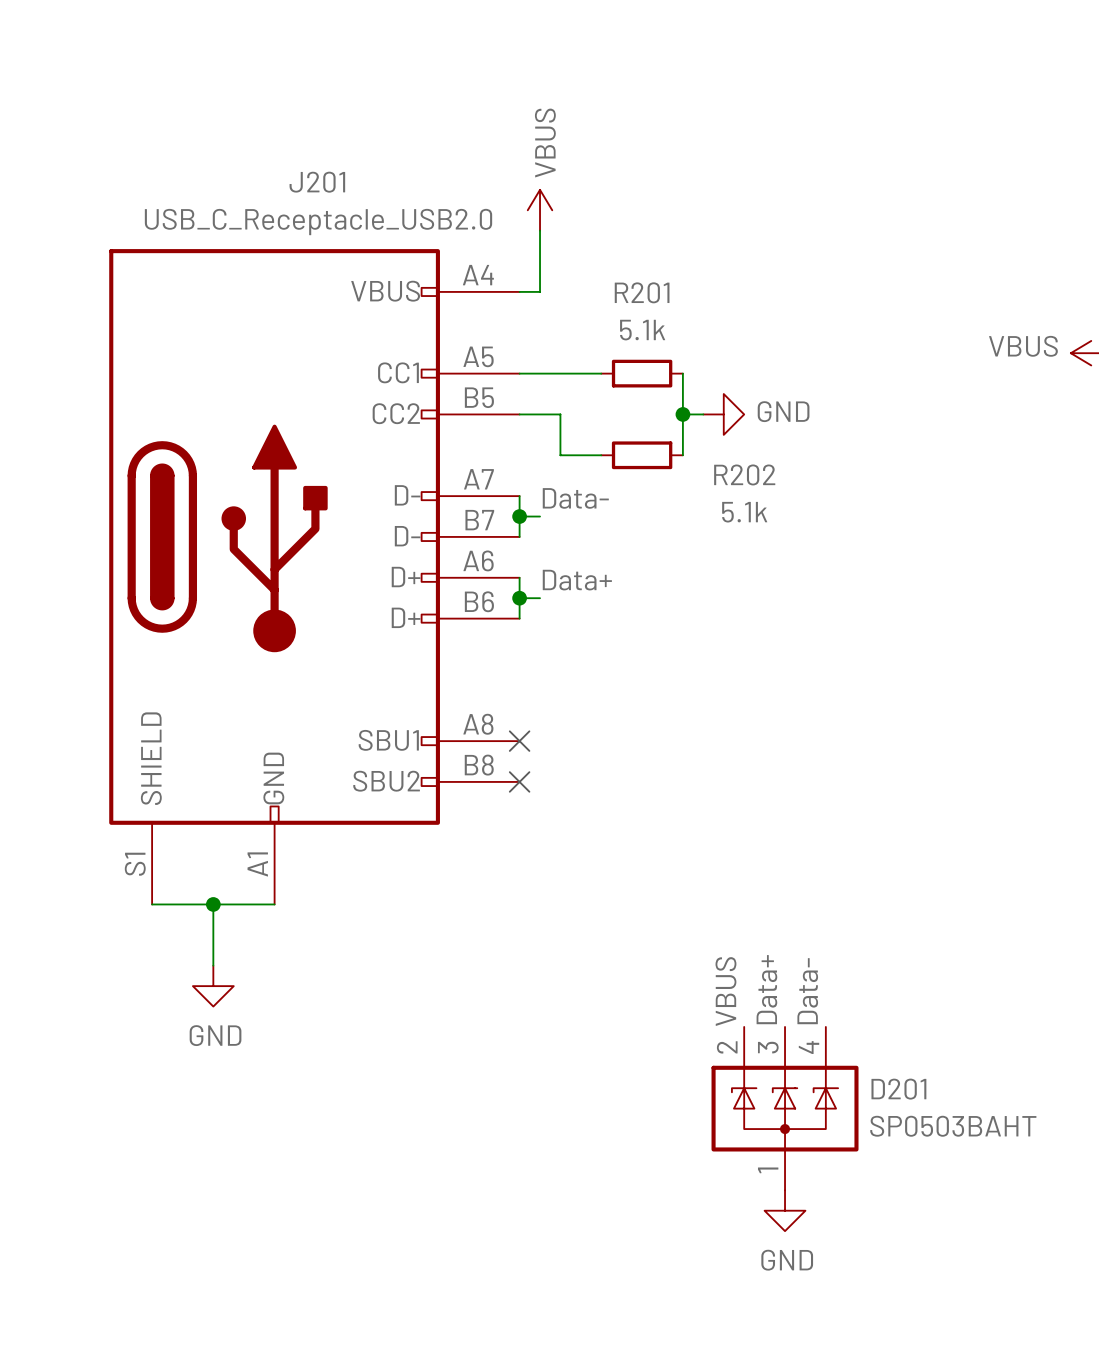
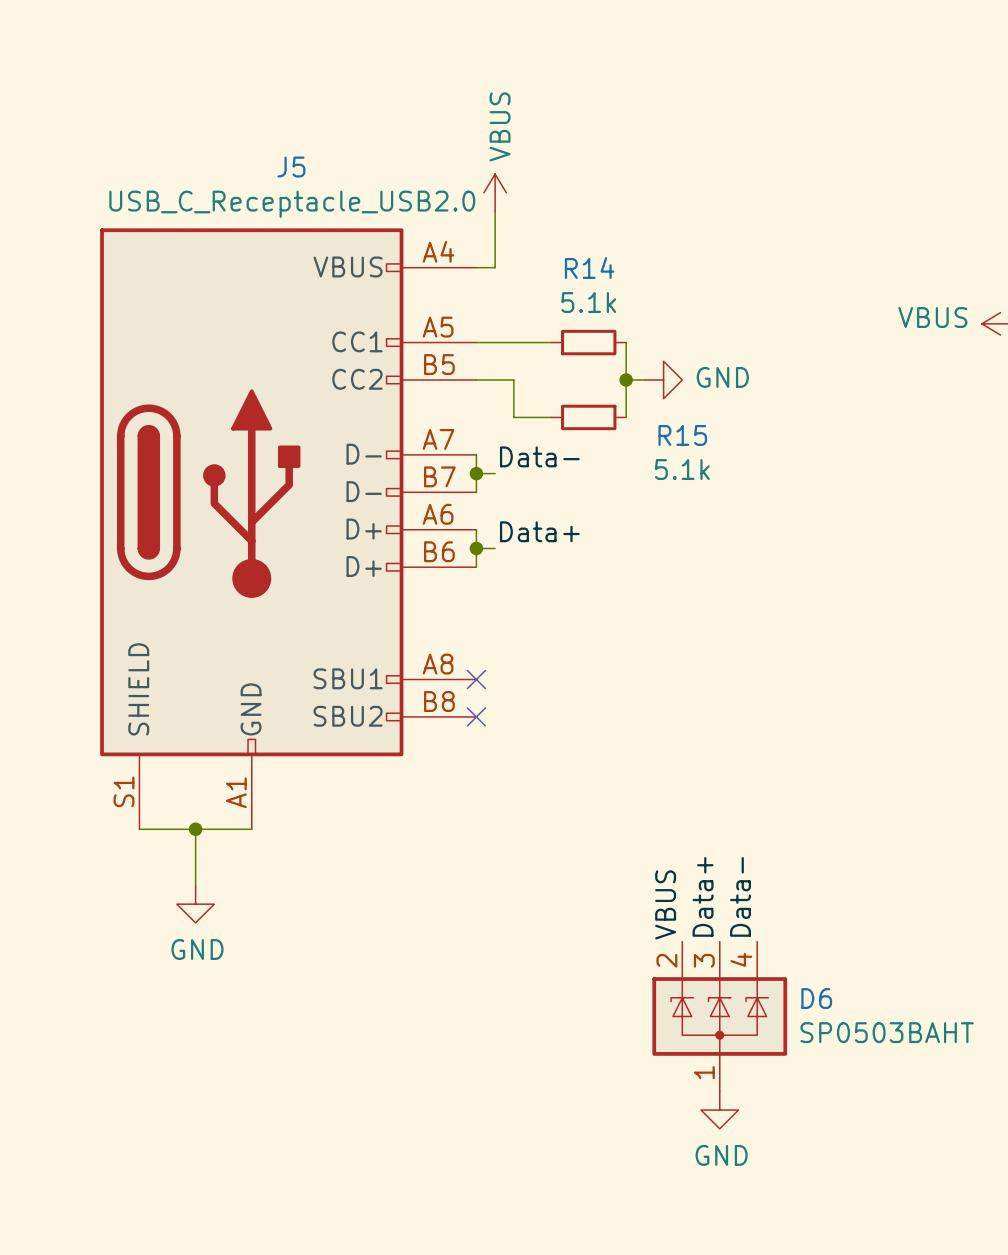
J201 name: J201 (317, 182) -> J5 (291, 167)
R201 name: R201 (642, 292) -> R14 (589, 268)
R202 name: R202 (744, 474) -> R15 (682, 435)
D201 name: D201 (898, 1089) -> D6 (816, 998)

